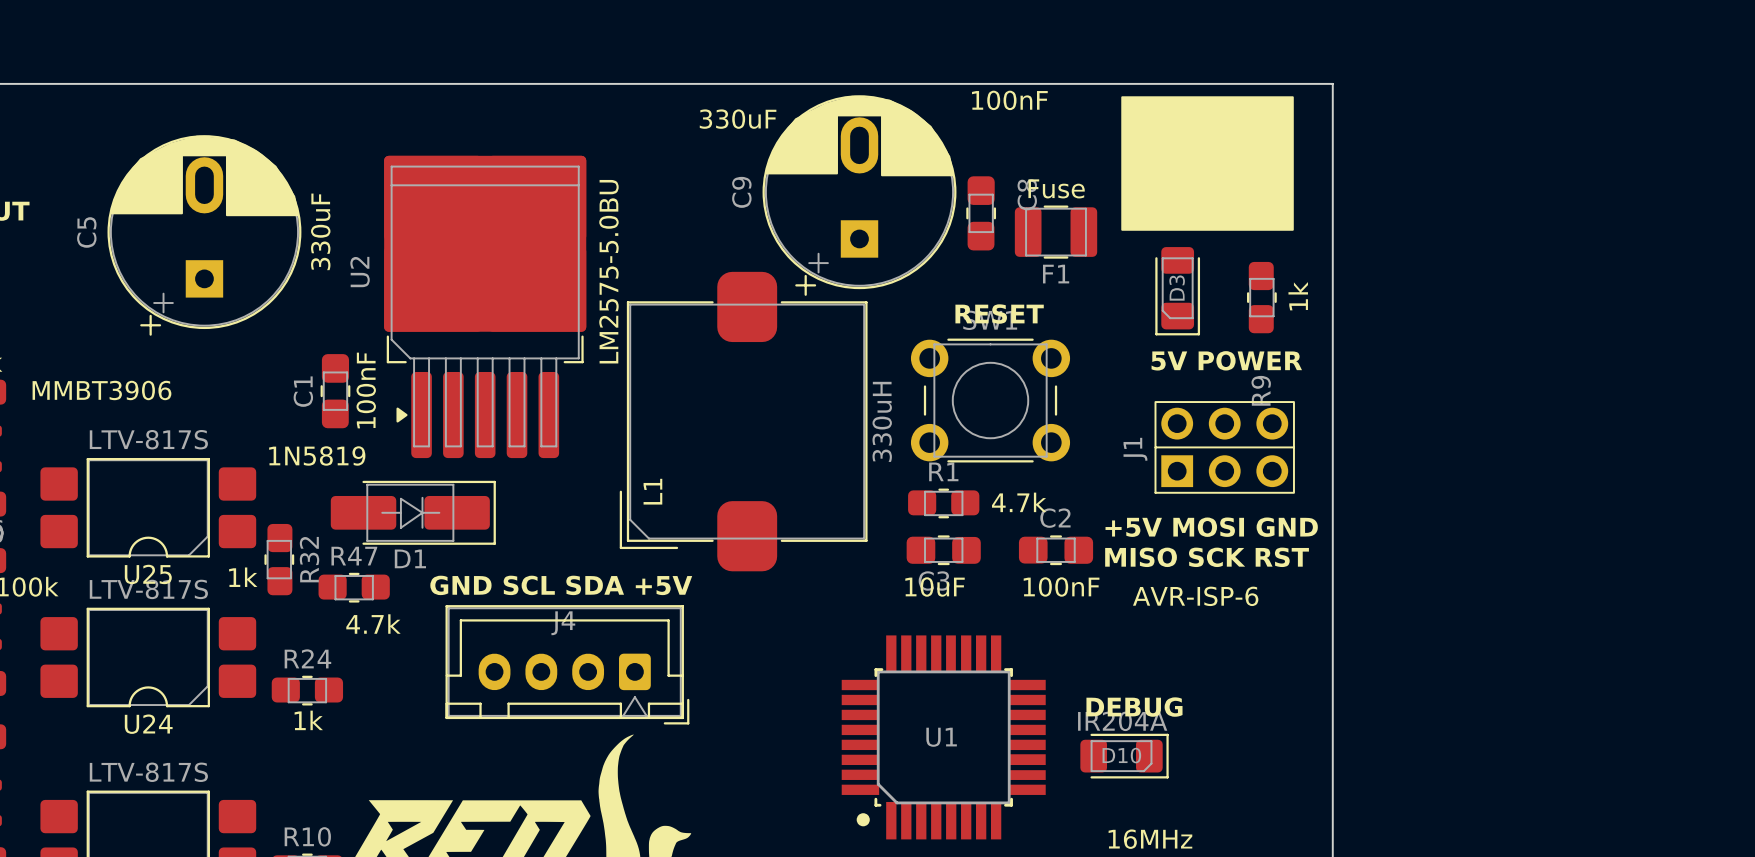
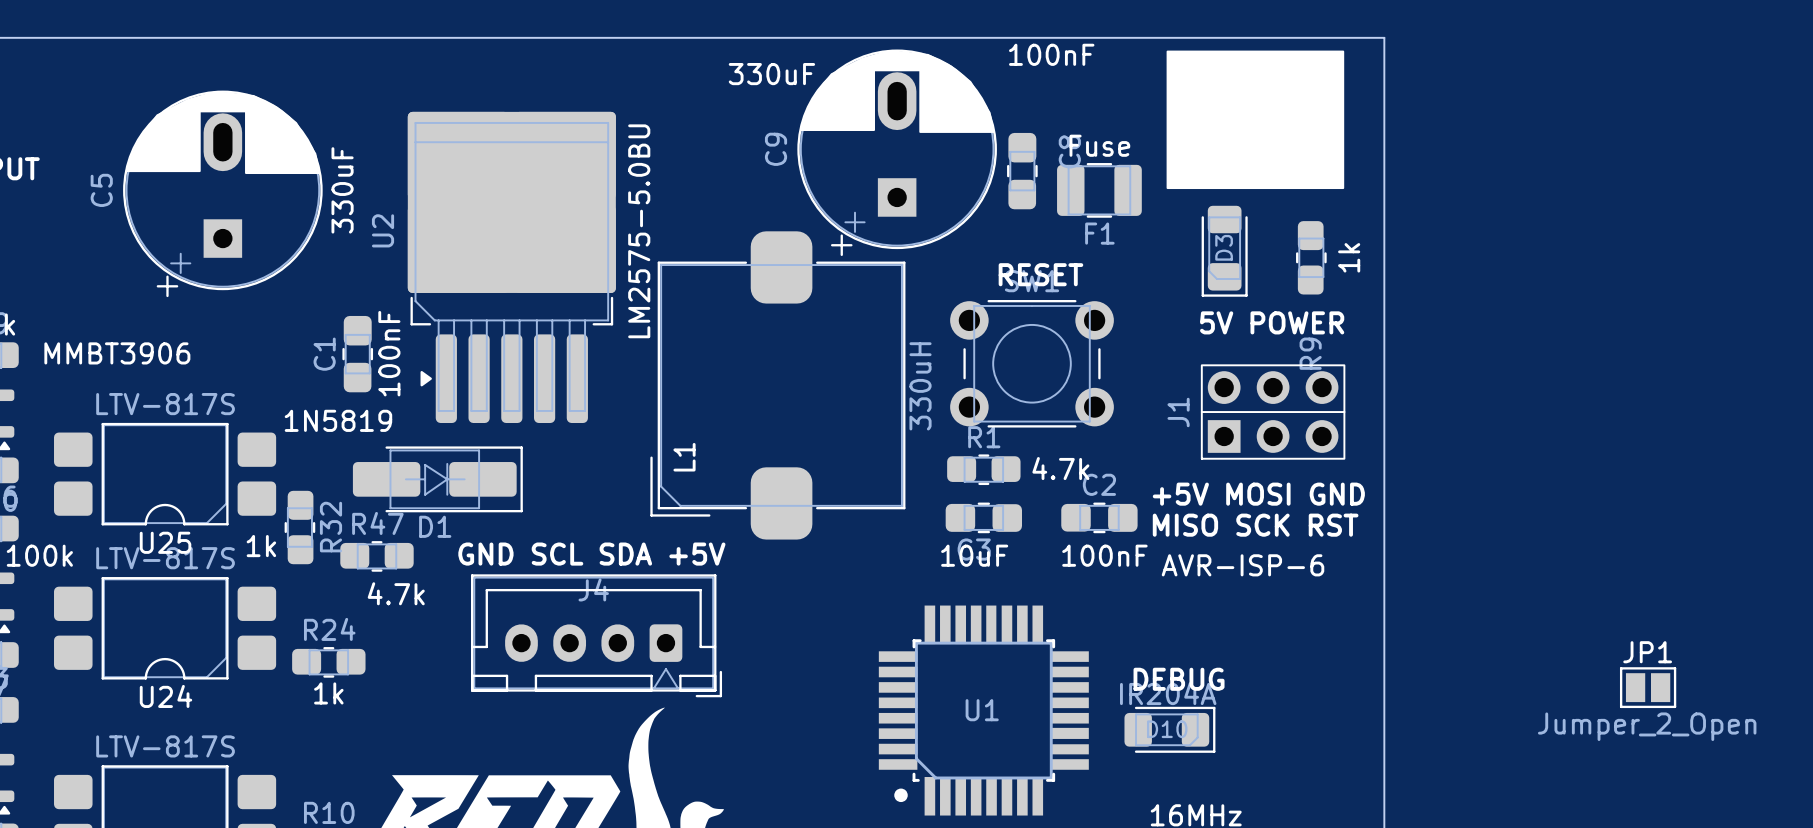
JP1: none -> Jumper_2_Open (1648, 687)

